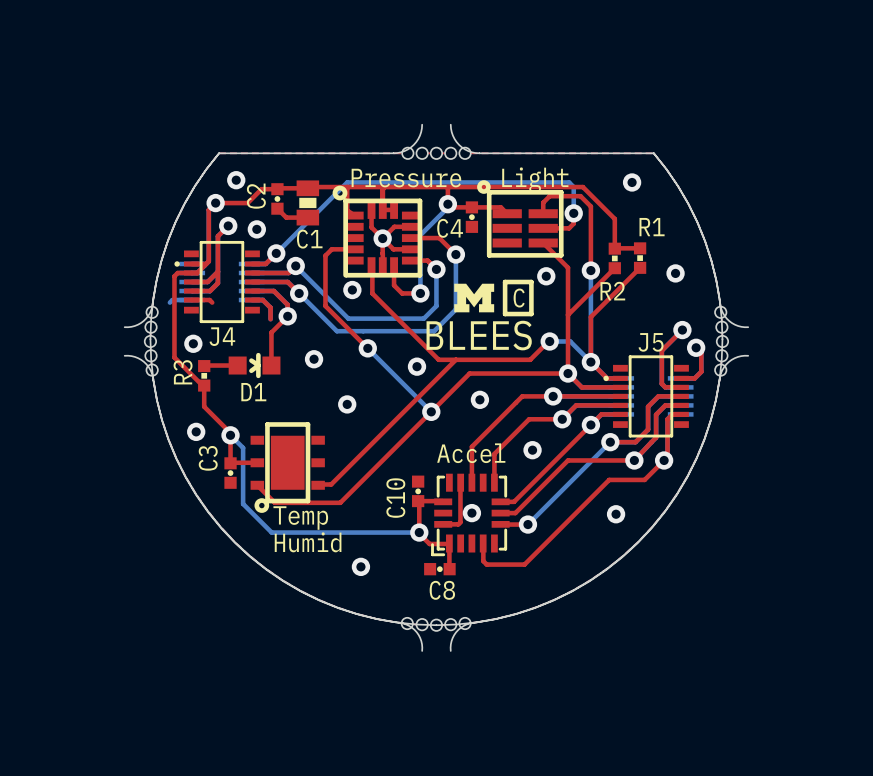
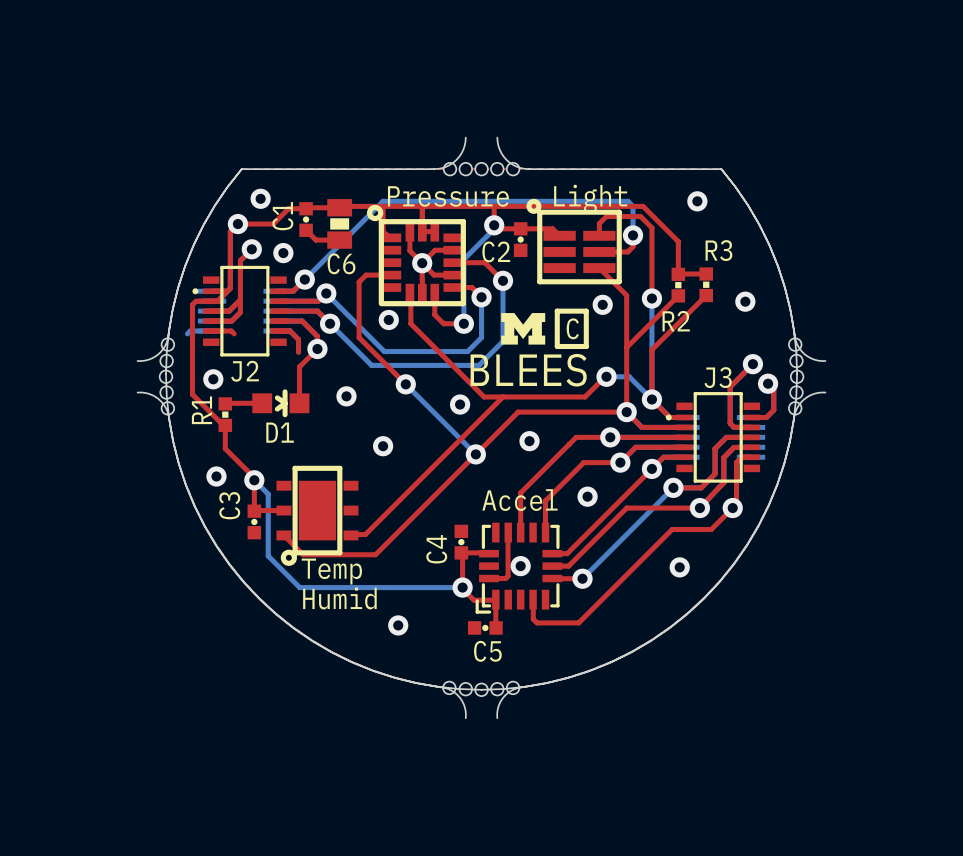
C2 name: C2 (256, 196) -> C1 (282, 216)
R1 name: R1 (652, 227) -> R3 (718, 250)
C4 name: C4 (450, 228) -> C2 (496, 251)
C1 name: C1 (309, 239) -> C6 (341, 263)
J4 name: J4 (222, 336) -> J2 (245, 371)
J5 name: J5 (651, 342) -> J3 (718, 377)
R3 name: R3 (183, 372) -> R1 (201, 410)
C10 name: C10 (395, 498) -> C4 (436, 549)
C8 name: C8 (442, 590) -> C5 (487, 651)

